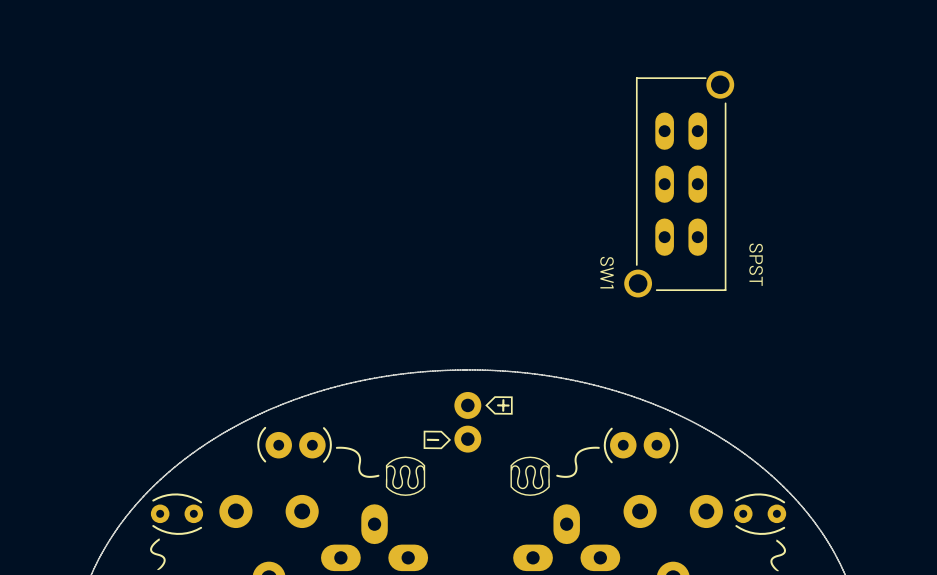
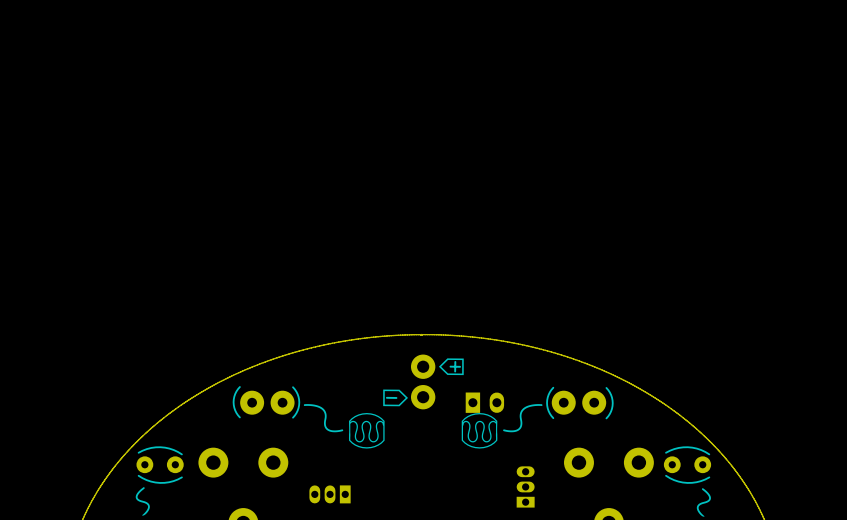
SW1: SPST (679, 184) -> none
part: none -> (484, 402)
part footprint: [321, 504, 429, 572] -> [309, 485, 351, 504]
part: (566, 537) -> none
part: none -> (525, 486)

